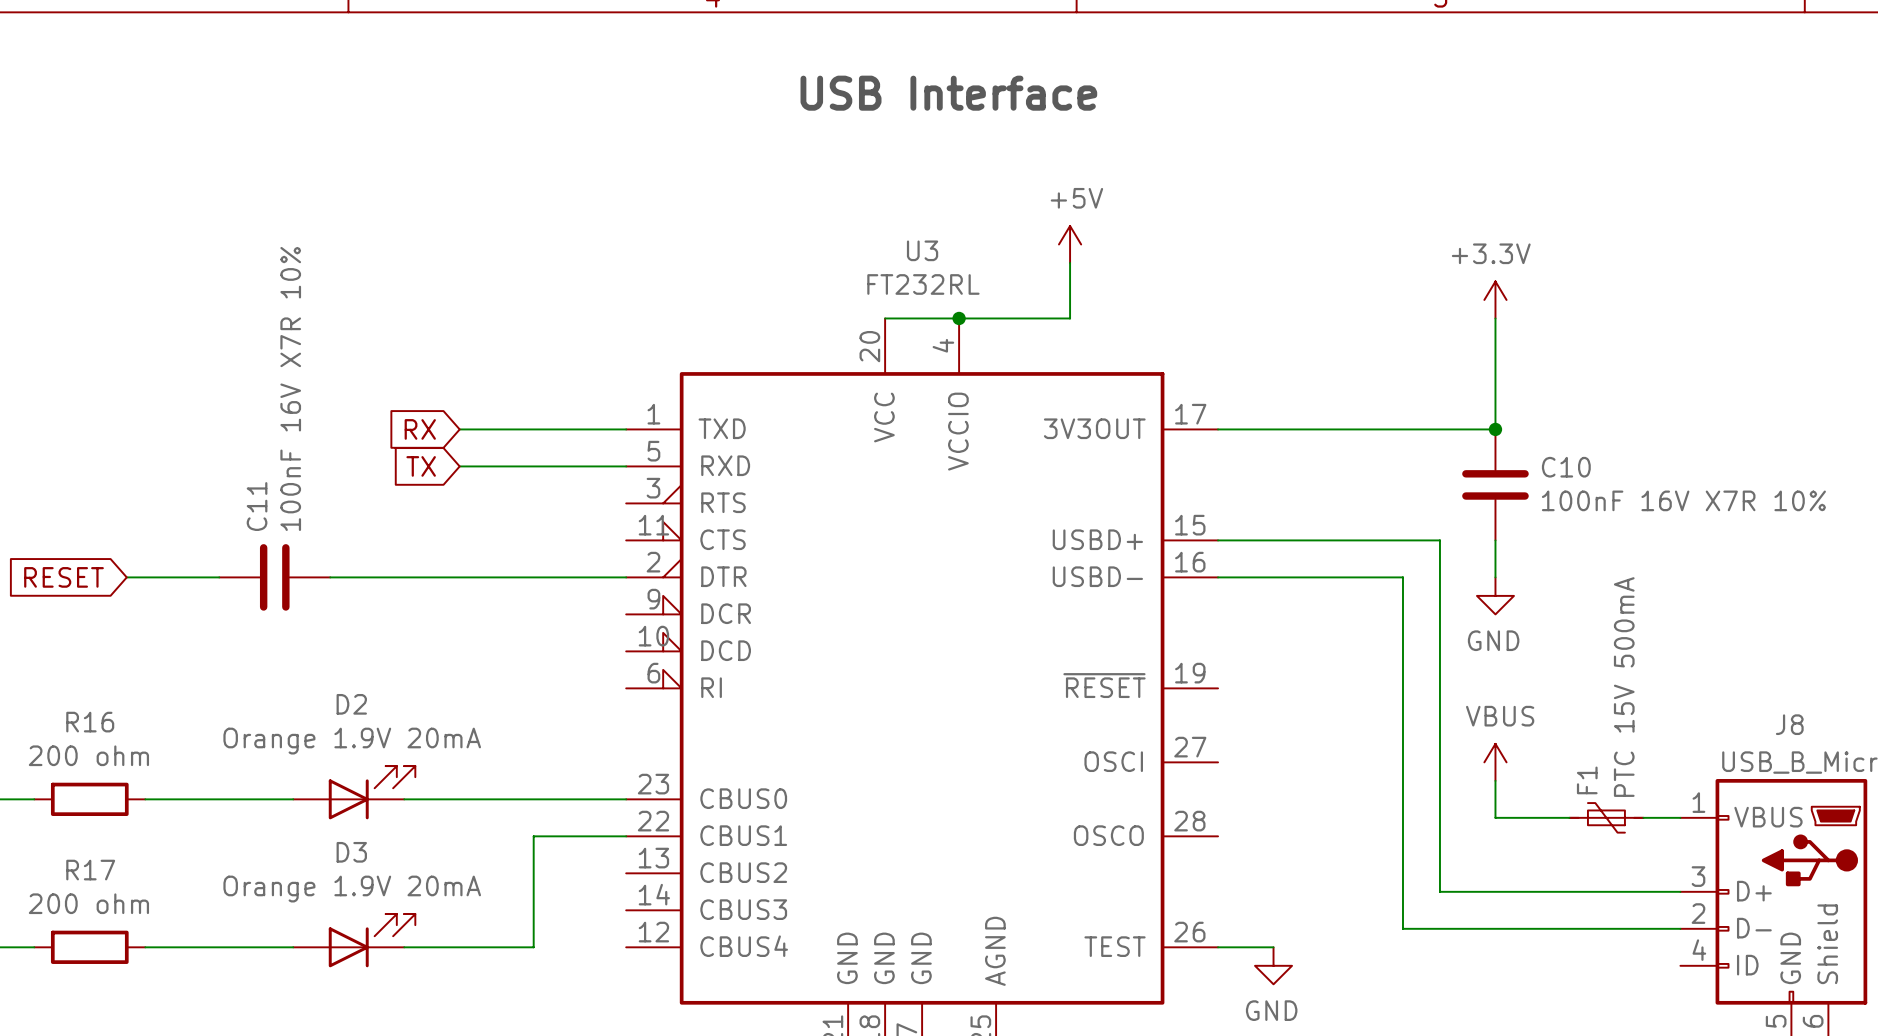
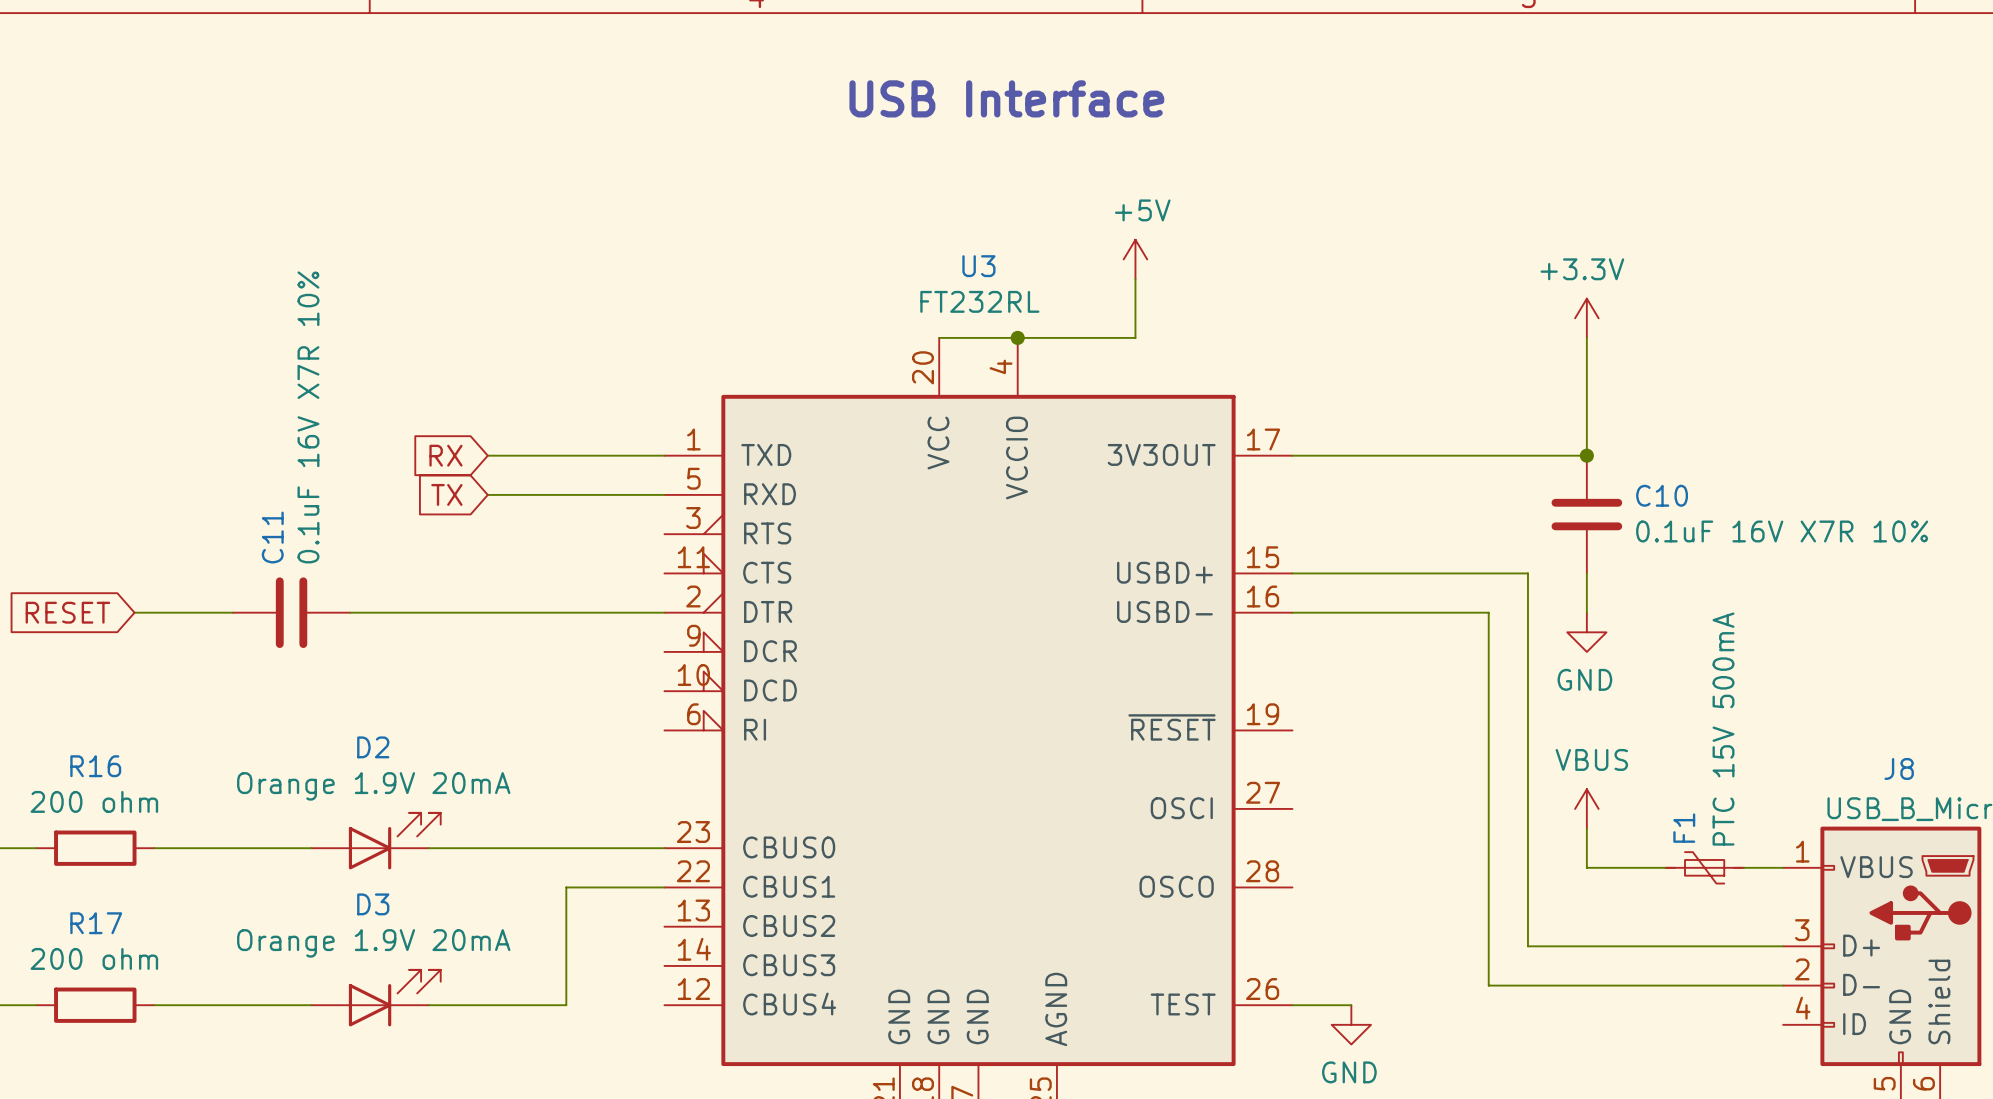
C11 value: 100nF 16V X7R 10% (290, 388) -> 0.1uF 16V X7R 10% (308, 417)
C10 value: 100nF 16V X7R 10% (1683, 500) -> 0.1uF 16V X7R 10% (1782, 531)

